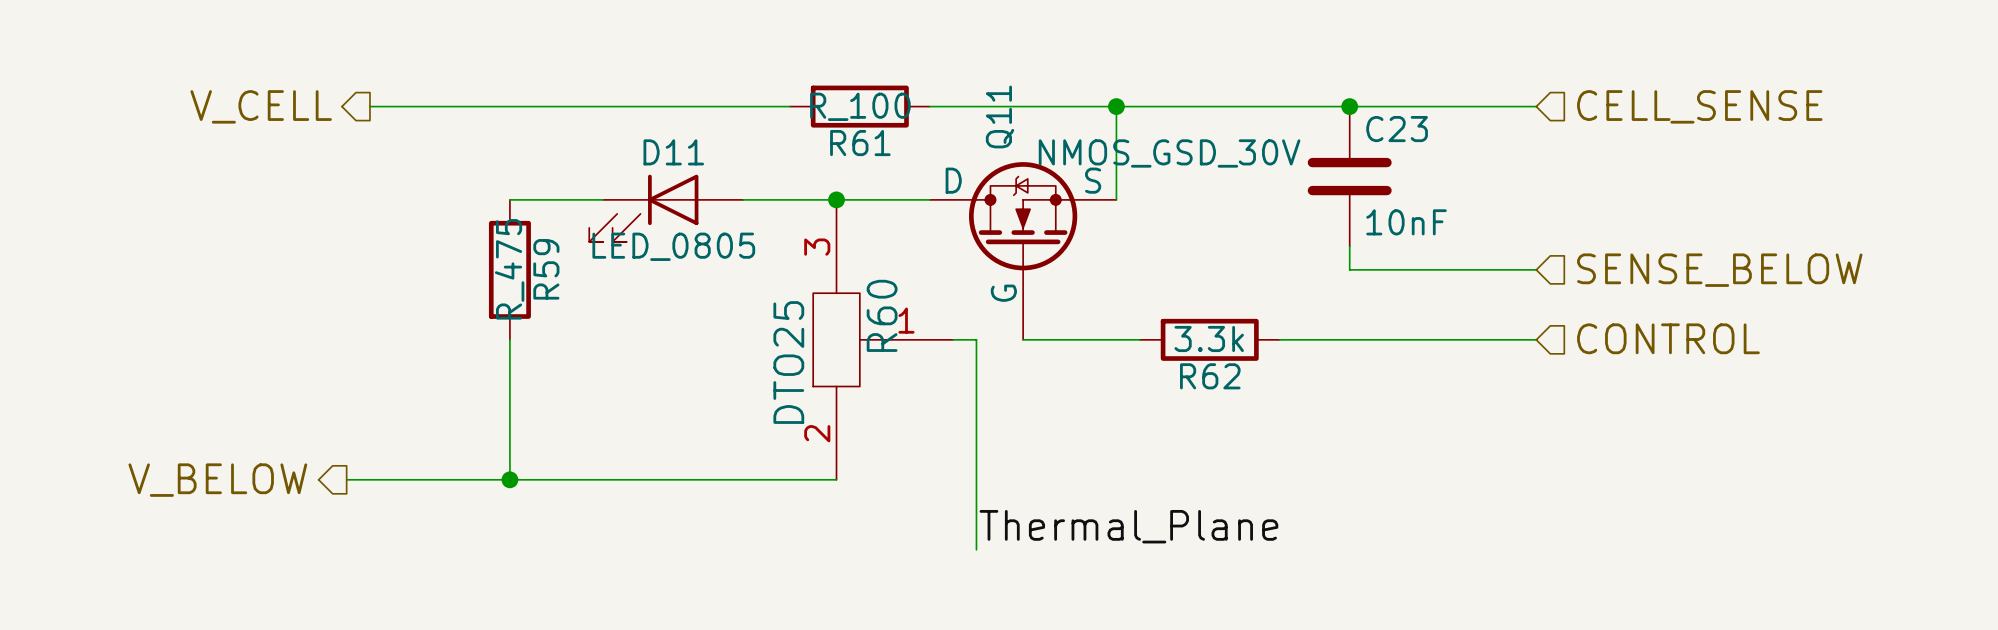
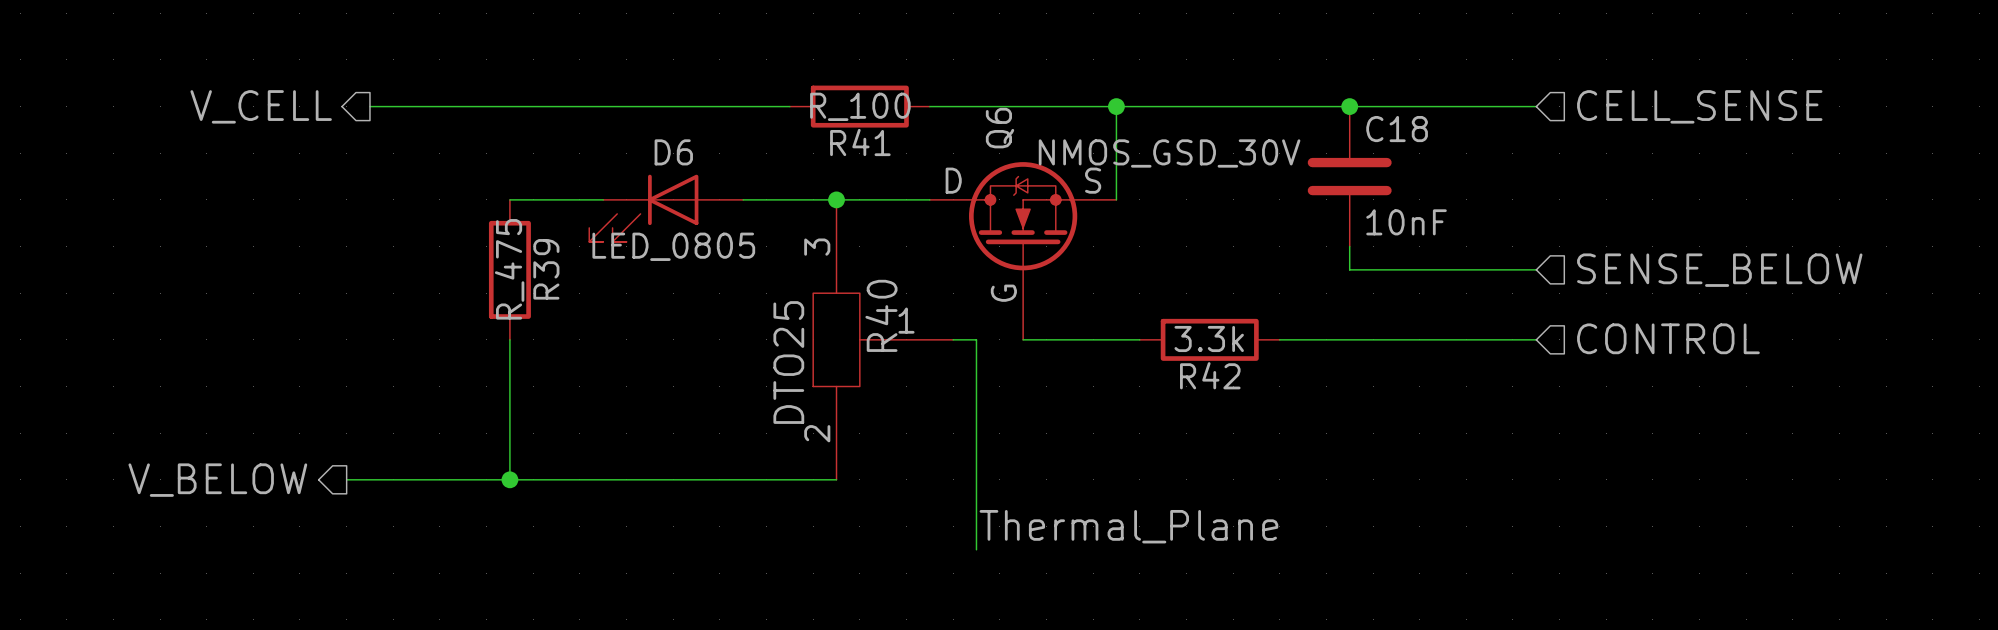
Q11 name: Q11 (1000, 116) -> Q6 (1000, 128)
C23 name: C23 (1397, 129) -> C18 (1397, 129)
R61 name: R61 (860, 143) -> R41 (860, 142)
D11 name: D11 (673, 152) -> D6 (673, 152)
R59 name: R59 (546, 269) -> R39 (546, 269)
R60 name: R60 (882, 315) -> R40 (881, 315)
R62 name: R62 (1210, 376) -> R42 (1210, 375)

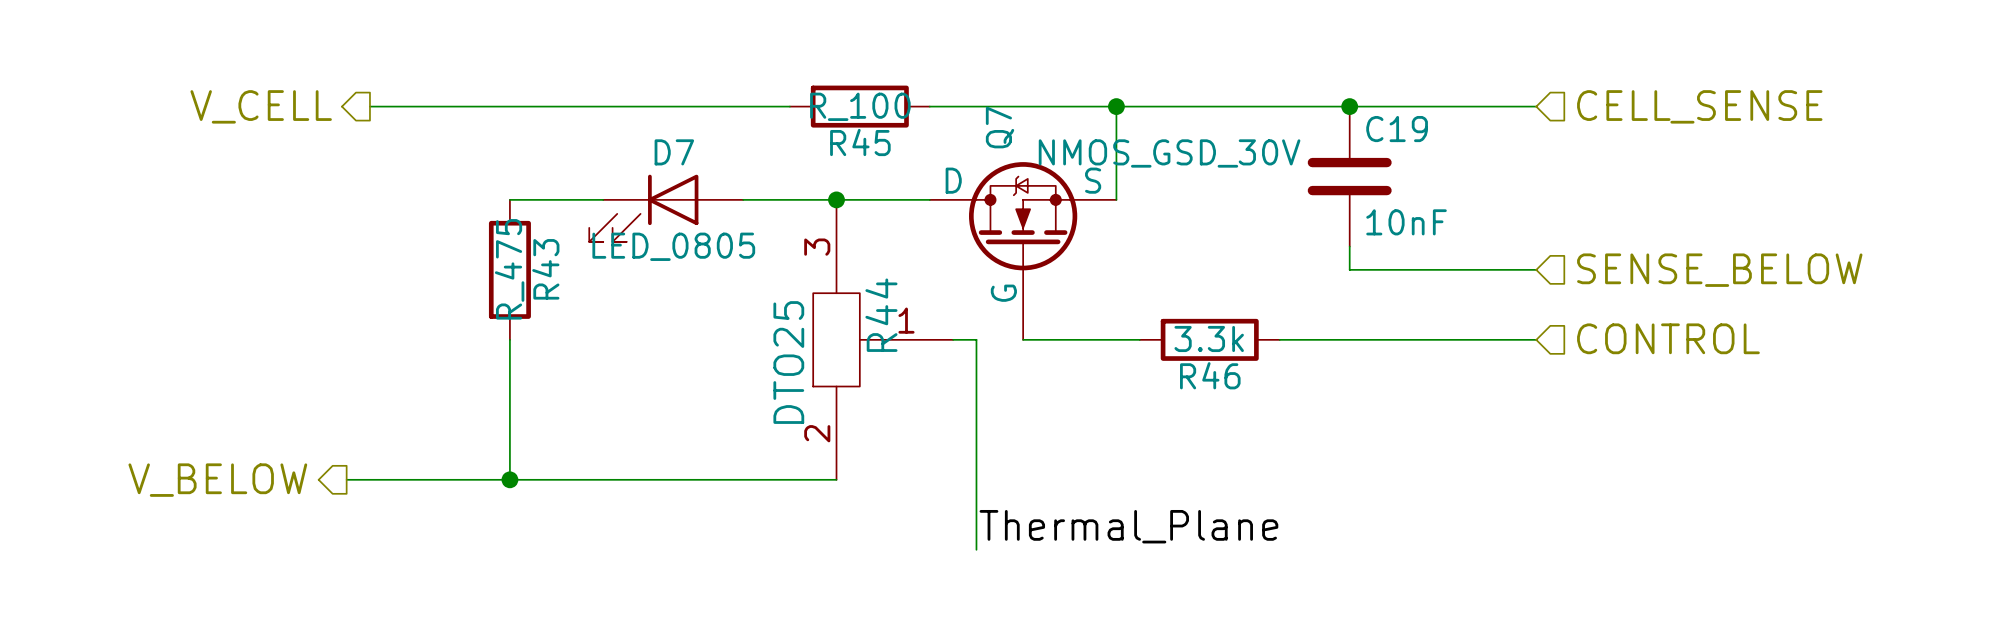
Q6 name: Q6 (1000, 128) -> Q7 (1000, 127)
C18 name: C18 (1397, 129) -> C19 (1397, 129)
R41 name: R41 (860, 142) -> R45 (860, 142)
D6 name: D6 (673, 152) -> D7 (674, 152)
R39 name: R39 (546, 269) -> R43 (545, 269)
R40 name: R40 (881, 315) -> R44 (881, 315)
R42 name: R42 (1210, 375) -> R46 (1210, 375)

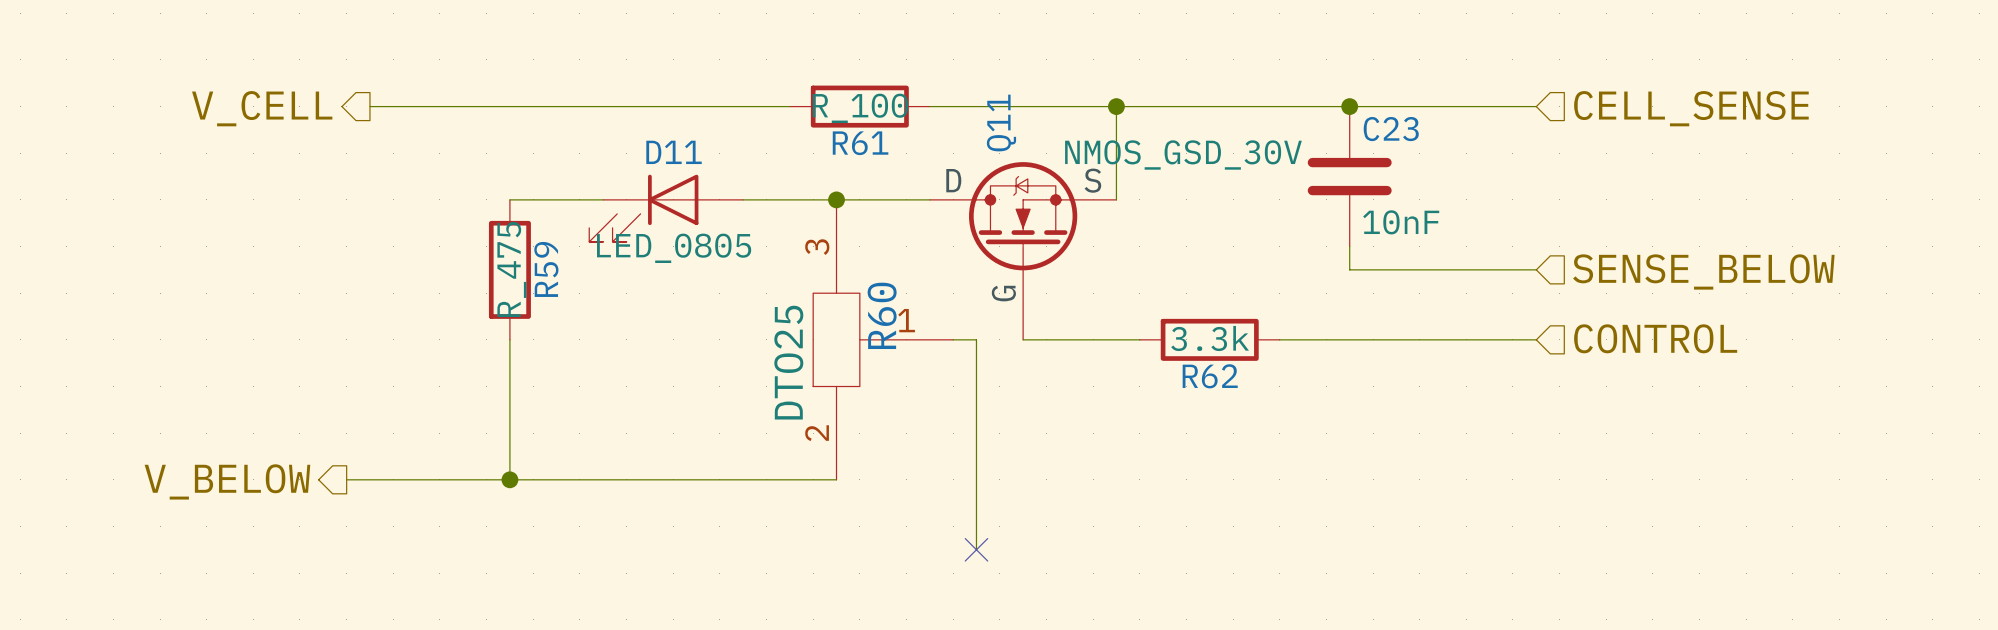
Q7 name: Q7 (1000, 127) -> Q11 (1001, 123)
C19 name: C19 (1397, 129) -> C23 (1391, 129)
R45 name: R45 (860, 142) -> R61 (860, 143)
D7 name: D7 (674, 152) -> D11 (674, 152)
R43 name: R43 (545, 269) -> R59 (546, 269)
R44 name: R44 (881, 315) -> R60 (882, 315)
R46 name: R46 (1210, 375) -> R62 (1210, 376)
label: Thermal_Plane (1128, 526) -> none
no-connect mark: none -> (976, 549)

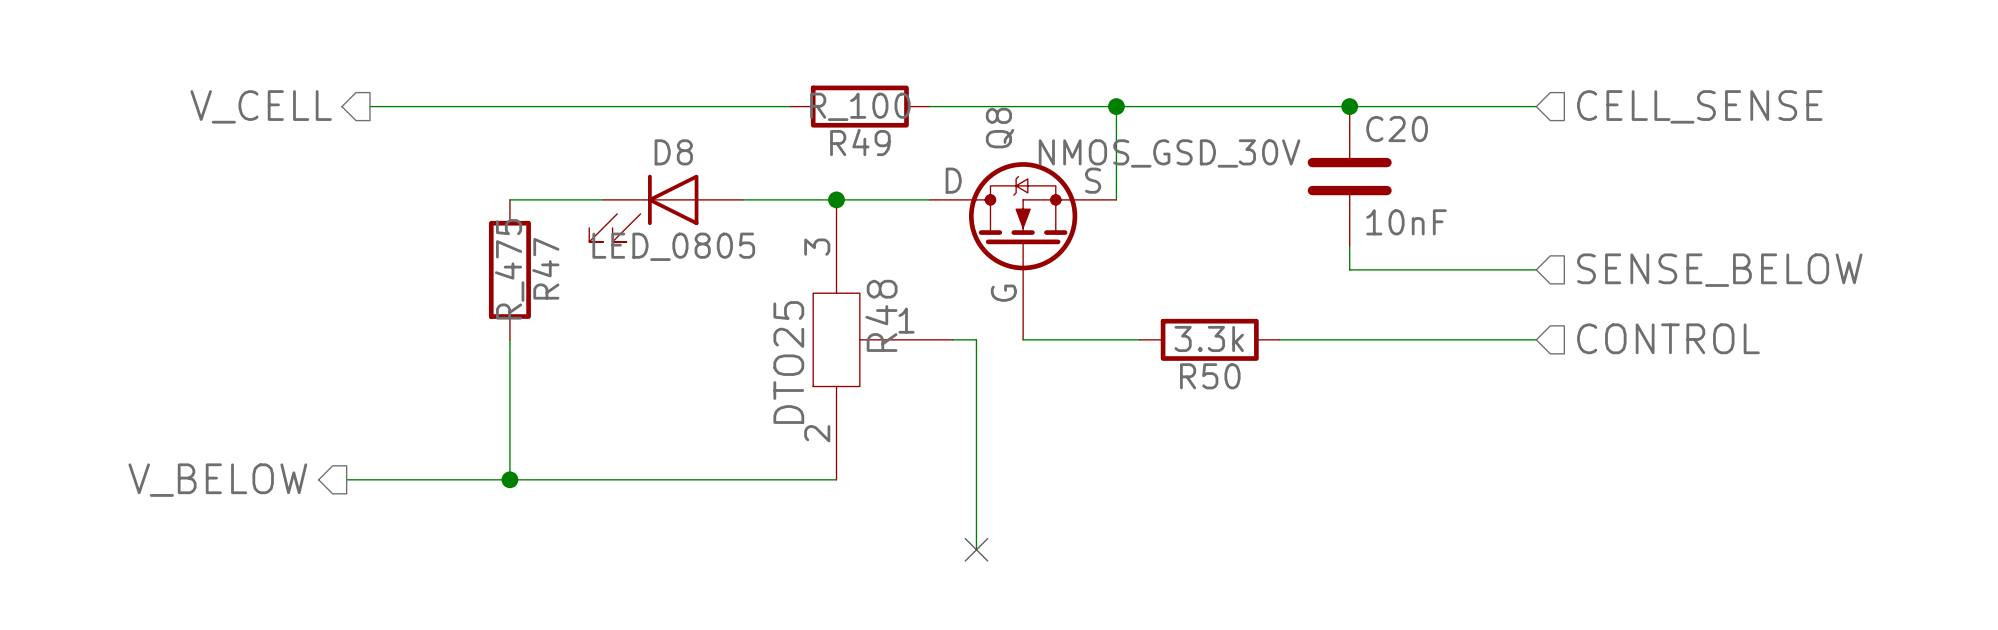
Q11 name: Q11 (1001, 123) -> Q8 (1000, 128)
C23 name: C23 (1391, 129) -> C20 (1397, 129)
R61 name: R61 (860, 143) -> R49 (860, 142)
D11 name: D11 (674, 152) -> D8 (673, 152)
R59 name: R59 (546, 269) -> R47 (545, 268)
R60 name: R60 (882, 315) -> R48 (881, 315)
R62 name: R62 (1210, 376) -> R50 (1210, 376)

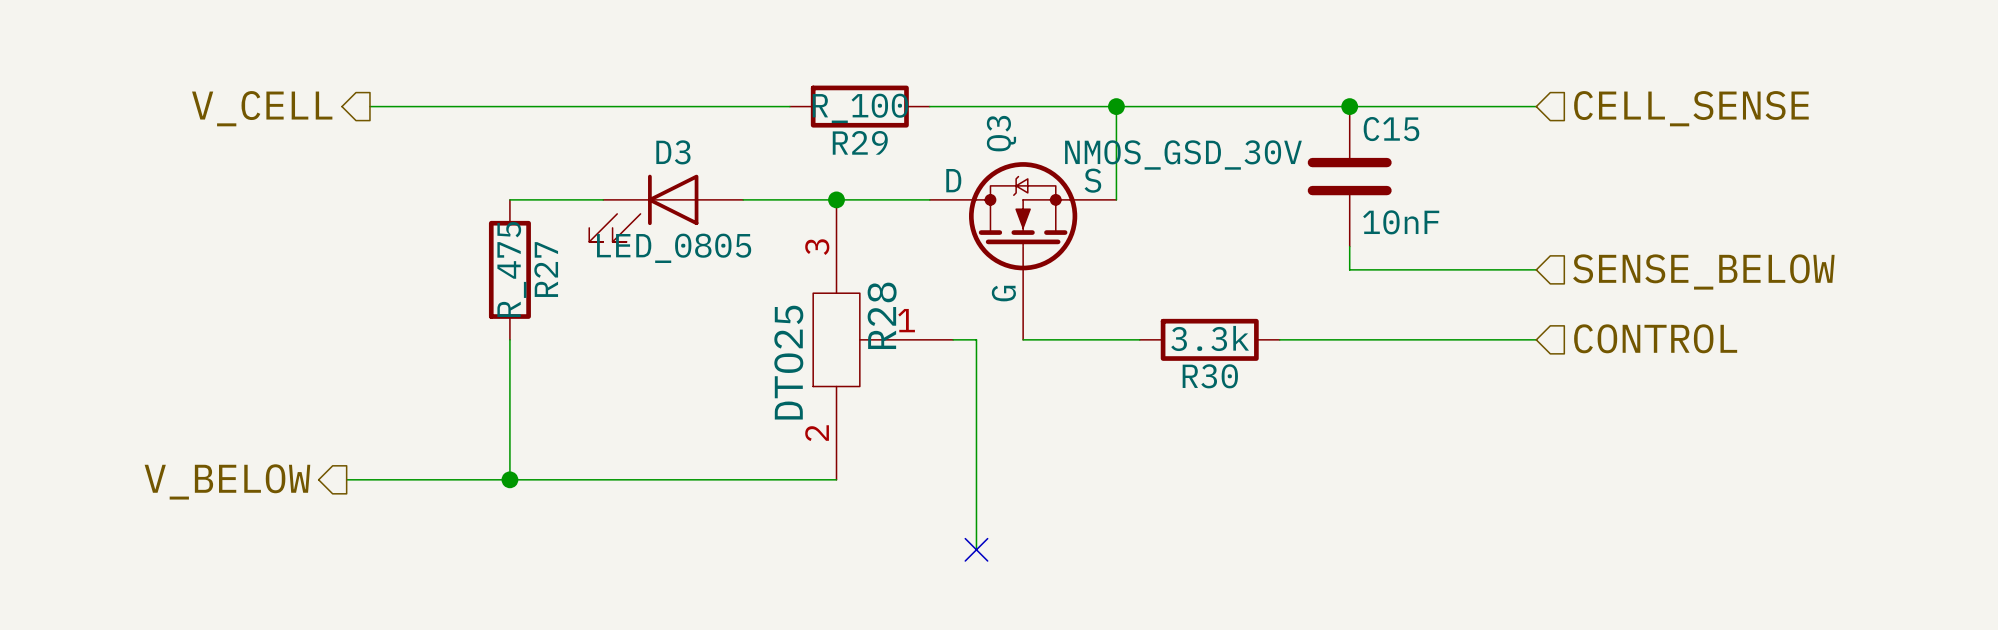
Q8 name: Q8 (1000, 128) -> Q3 (1001, 133)
C20 name: C20 (1397, 129) -> C15 (1391, 129)
R49 name: R49 (860, 142) -> R29 (860, 142)
D8 name: D8 (673, 152) -> D3 (673, 152)
R47 name: R47 (545, 268) -> R27 (546, 269)
R48 name: R48 (881, 315) -> R28 (882, 315)
R50 name: R50 (1210, 376) -> R30 (1210, 376)

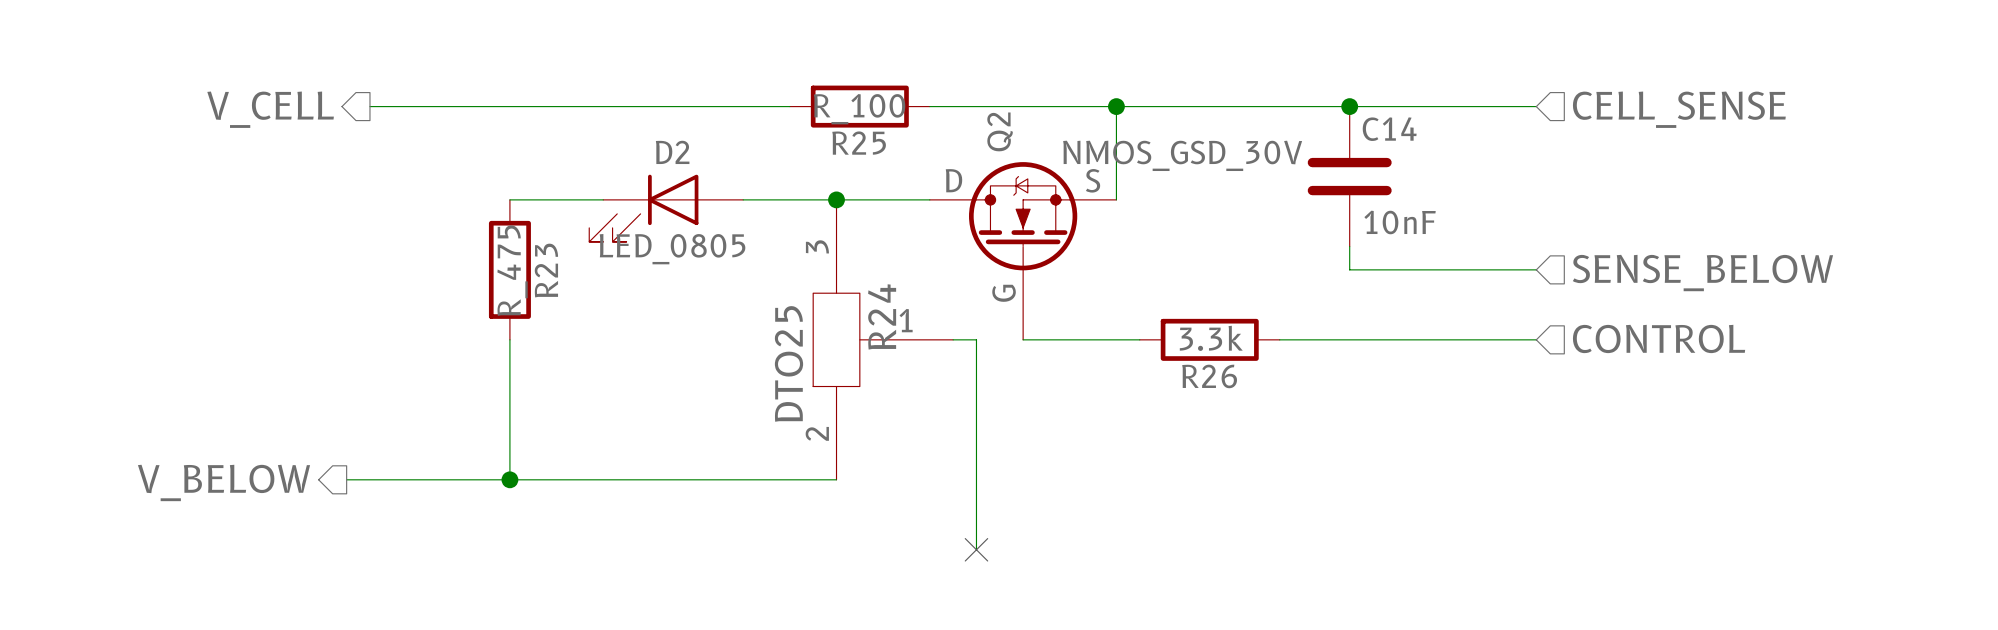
C15 name: C15 (1391, 129) -> C14 (1389, 129)
Q3 name: Q3 (1001, 133) -> Q2 (1000, 131)
R29 name: R29 (860, 142) -> R25 (859, 143)
D3 name: D3 (673, 152) -> D2 (672, 152)
R27 name: R27 (546, 269) -> R23 (546, 270)
R28 name: R28 (882, 315) -> R24 (882, 316)
R30 name: R30 (1210, 376) -> R26 (1209, 376)

